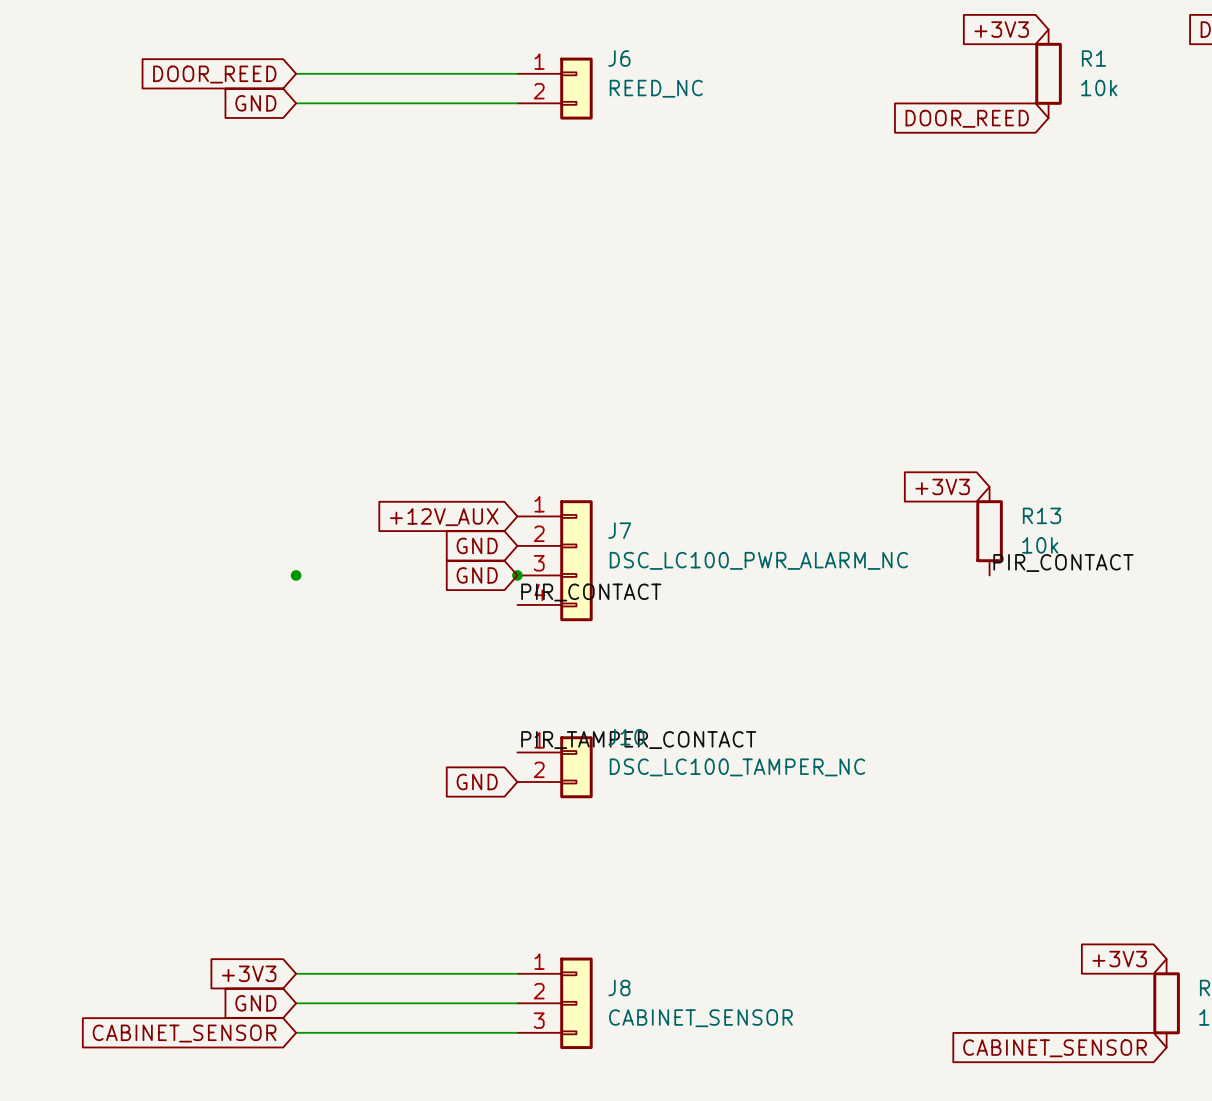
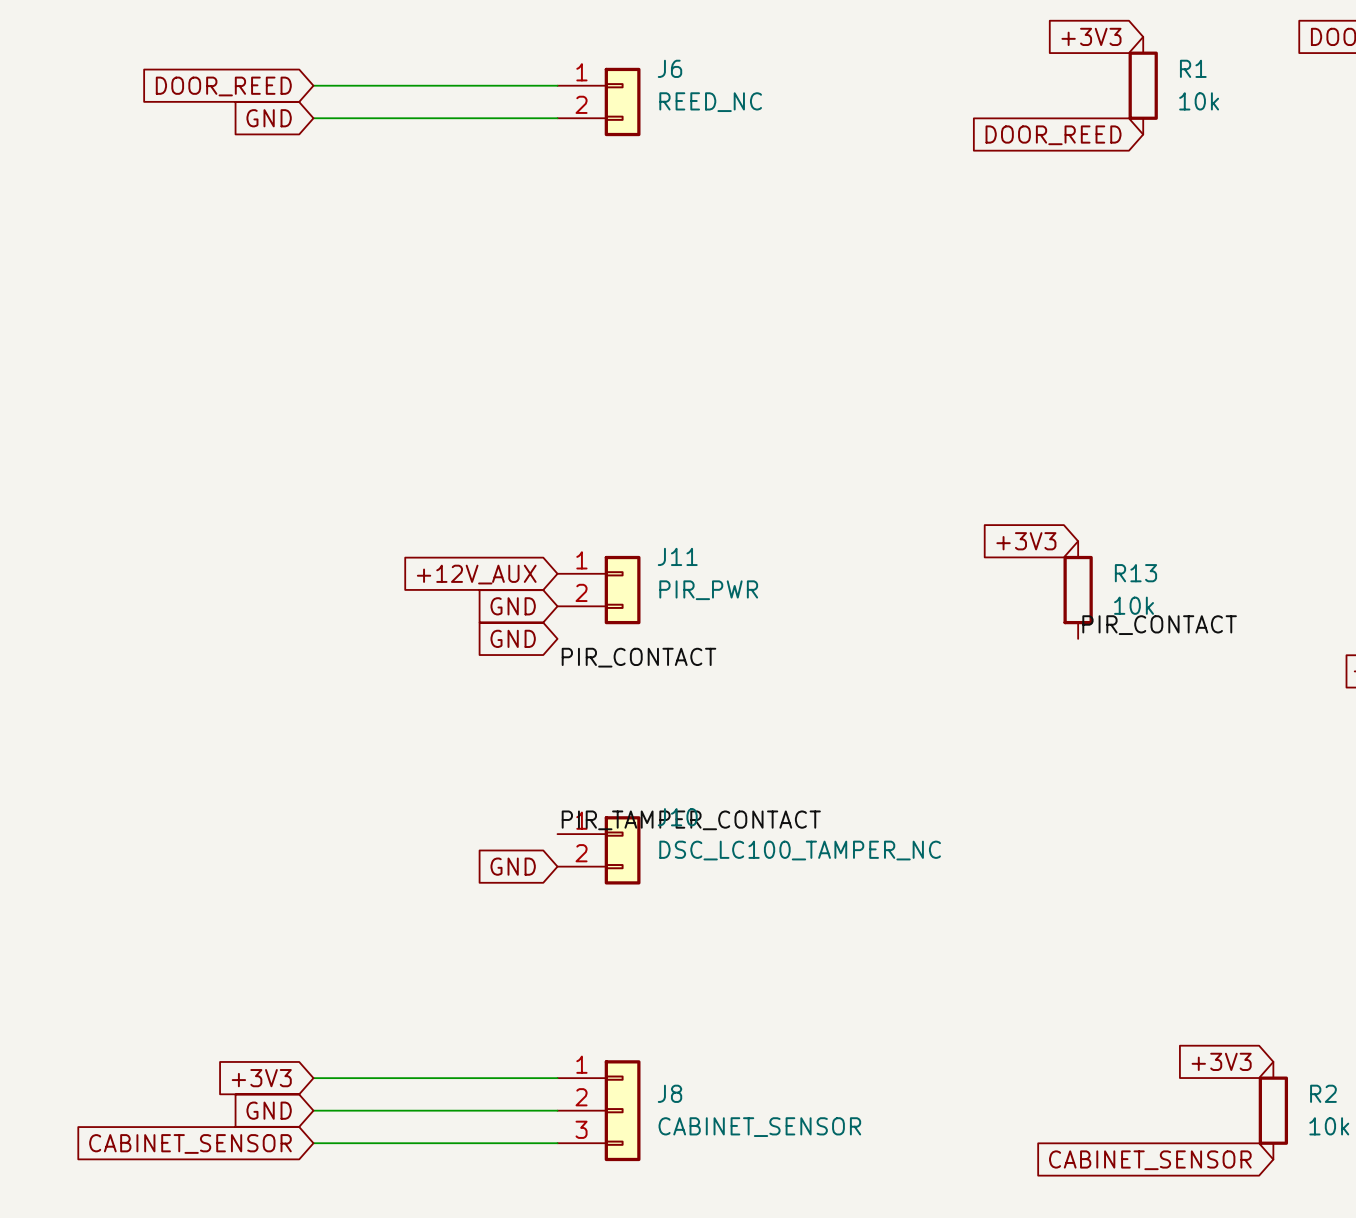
J11: none -> PIR_PWR (599, 590)
J7: DSC_LC100_PWR_ALARM_NC (555, 560) -> none
junction: (296, 575) -> none
junction: (517, 575) -> none

